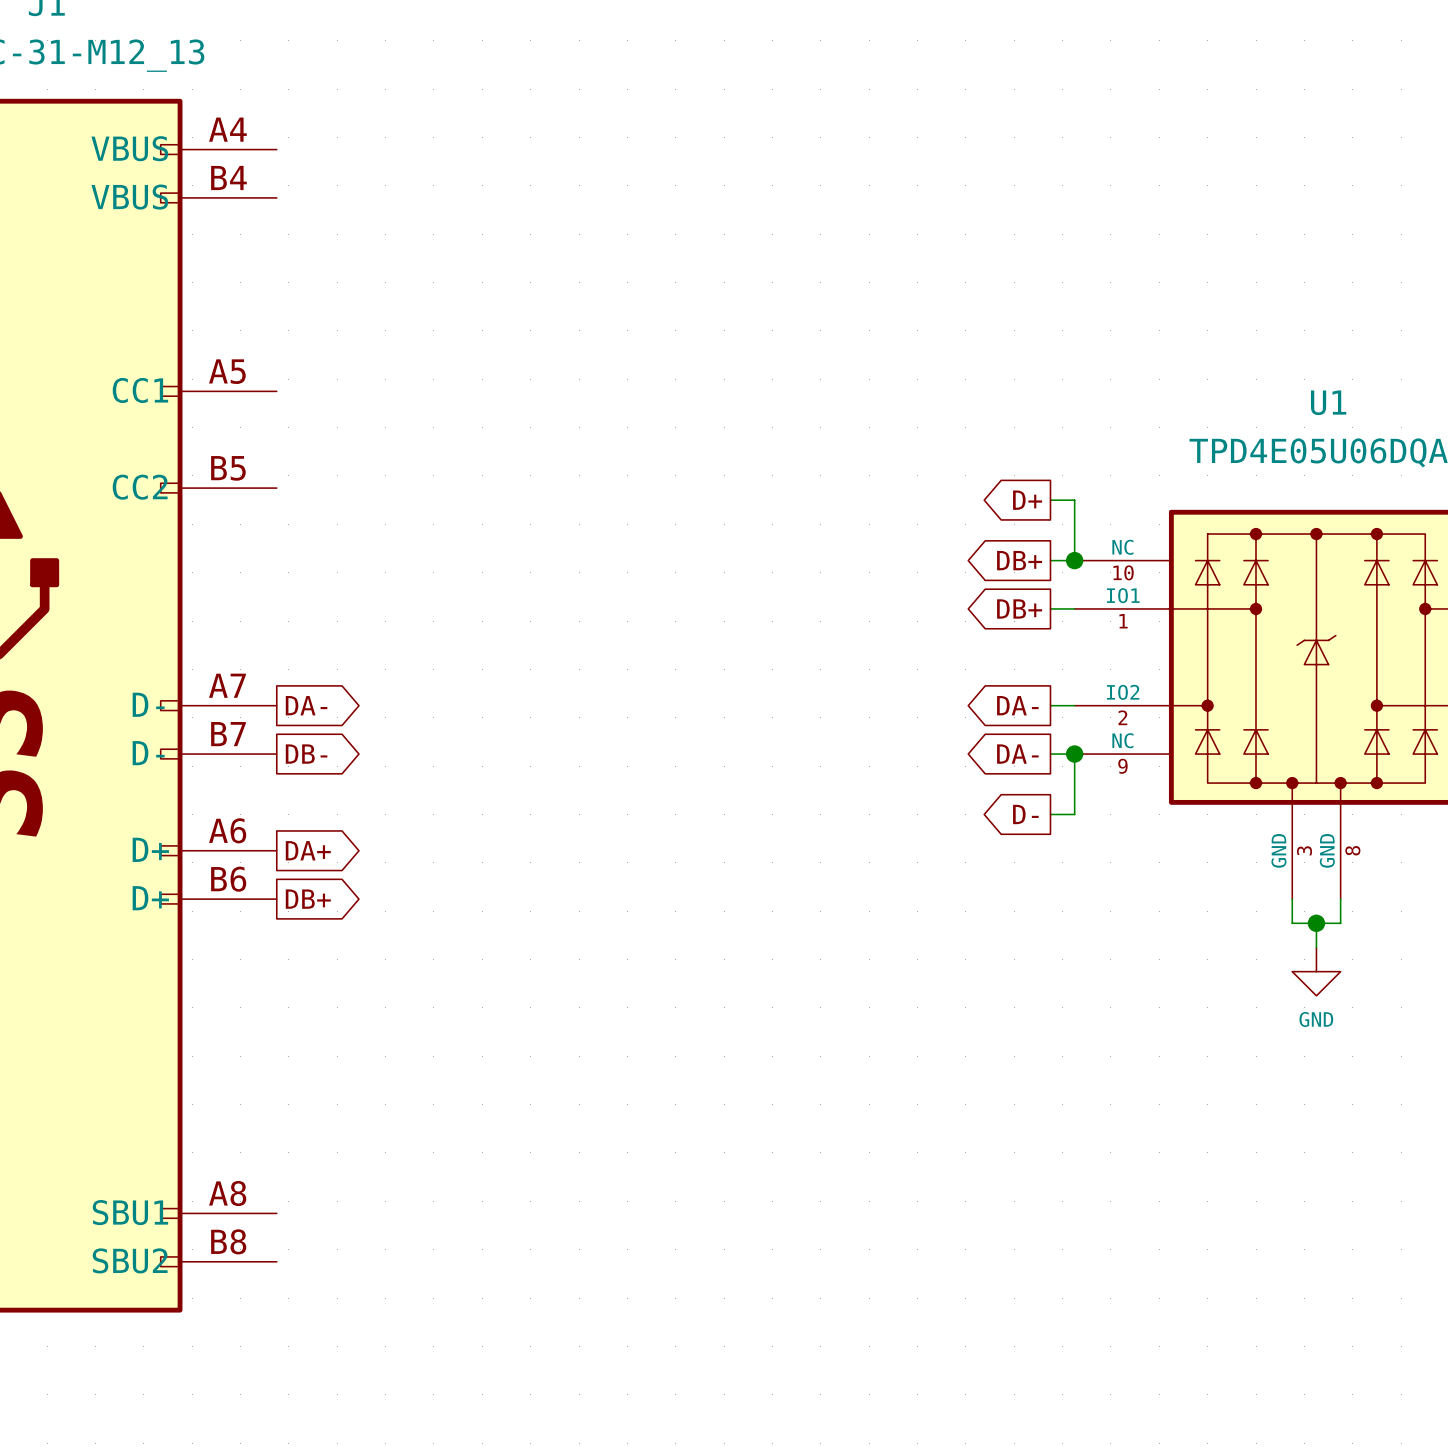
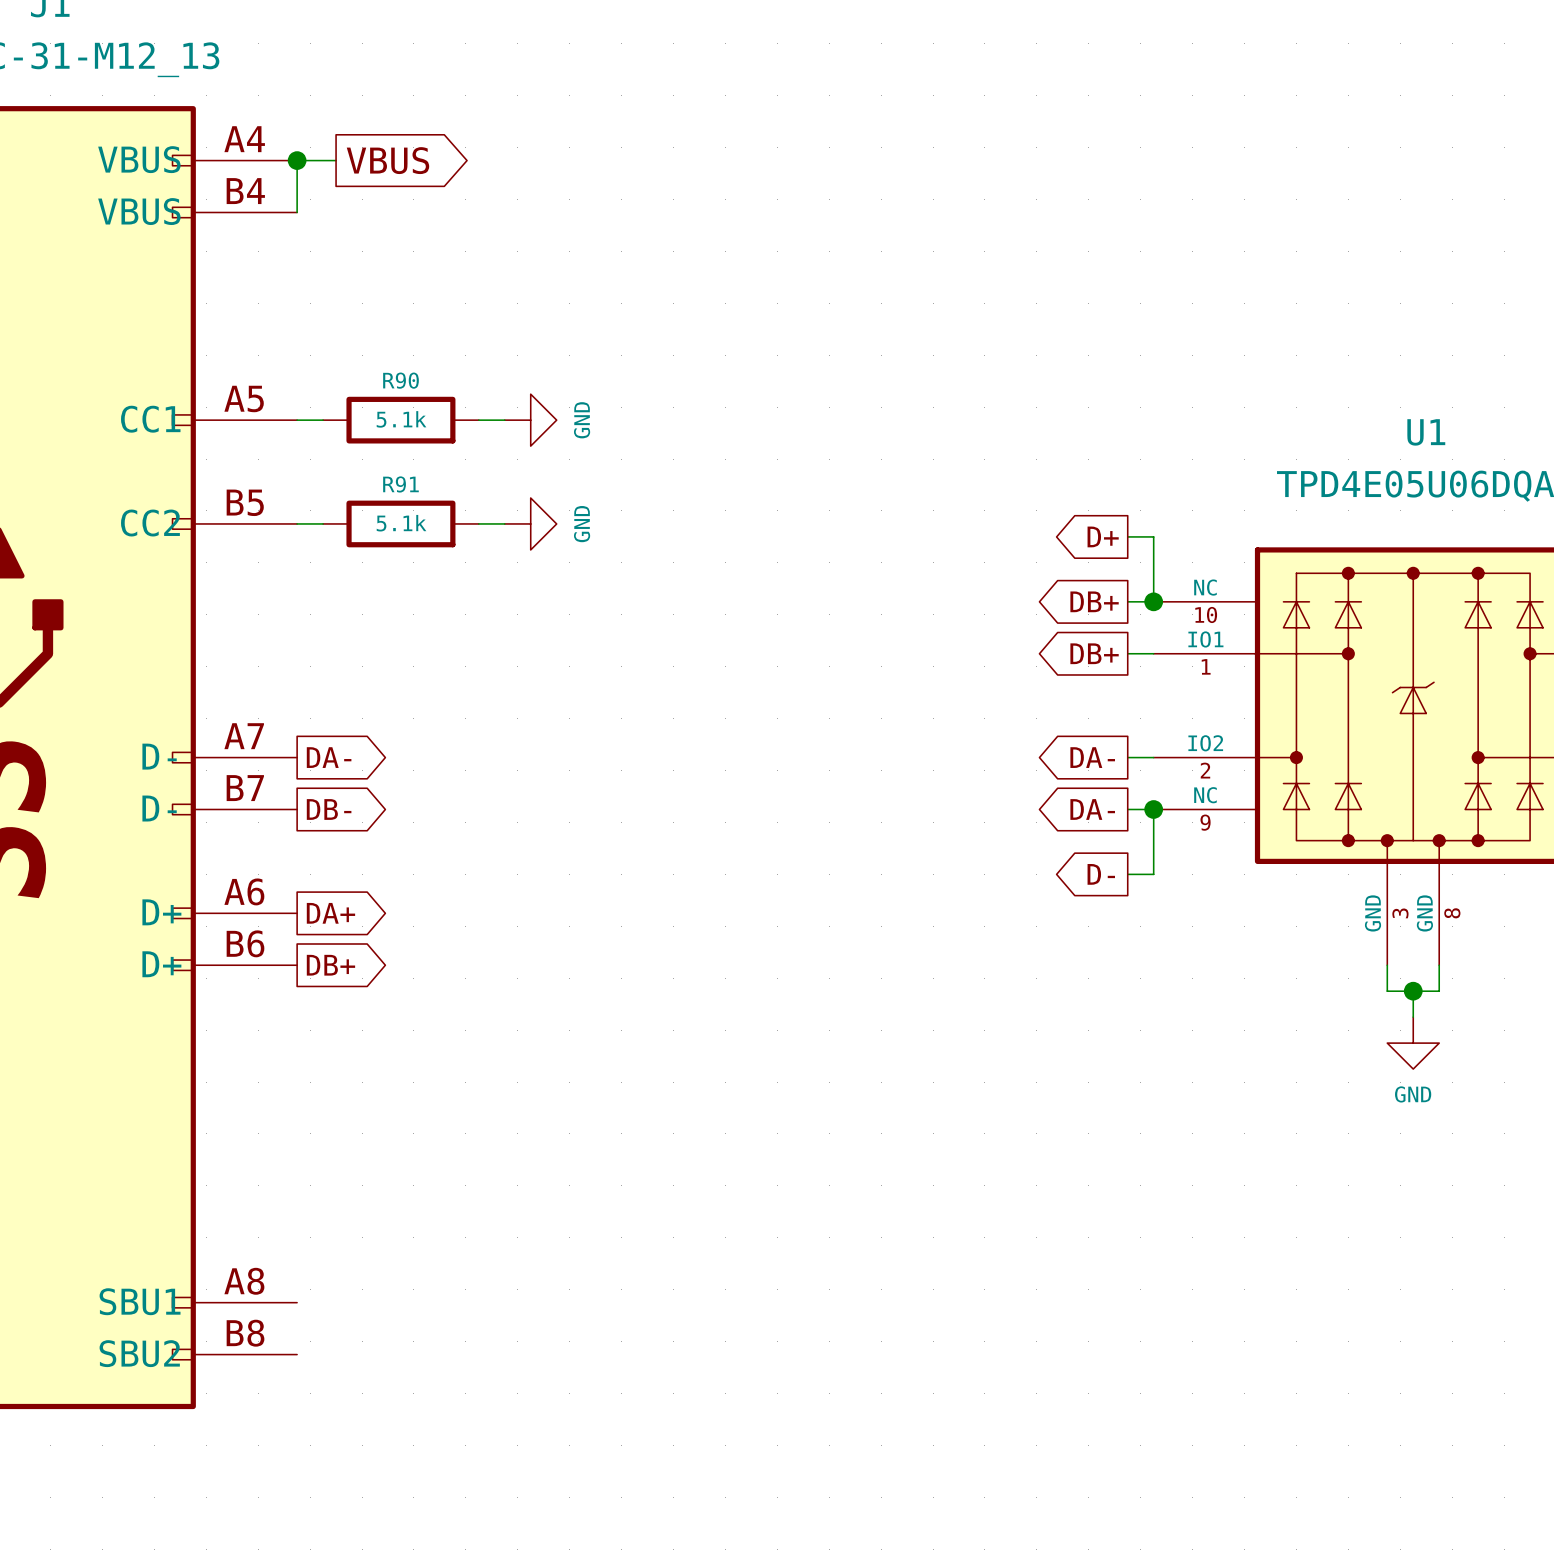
junction: none -> (297, 160)
wire: none -> (336, 160) (297, 160) (297, 212)
global label: none -> VBUS (387, 160)
wire: none -> (297, 420) (323, 420)
R90: none -> 5.1k (400, 420)
wire: none -> (478, 420) (504, 420)
power symbol: none -> GND (530, 420)
wire: none -> (297, 523) (323, 523)
R91: none -> 5.1k (400, 523)
wire: none -> (478, 523) (504, 523)
power symbol: none -> GND (530, 523)

